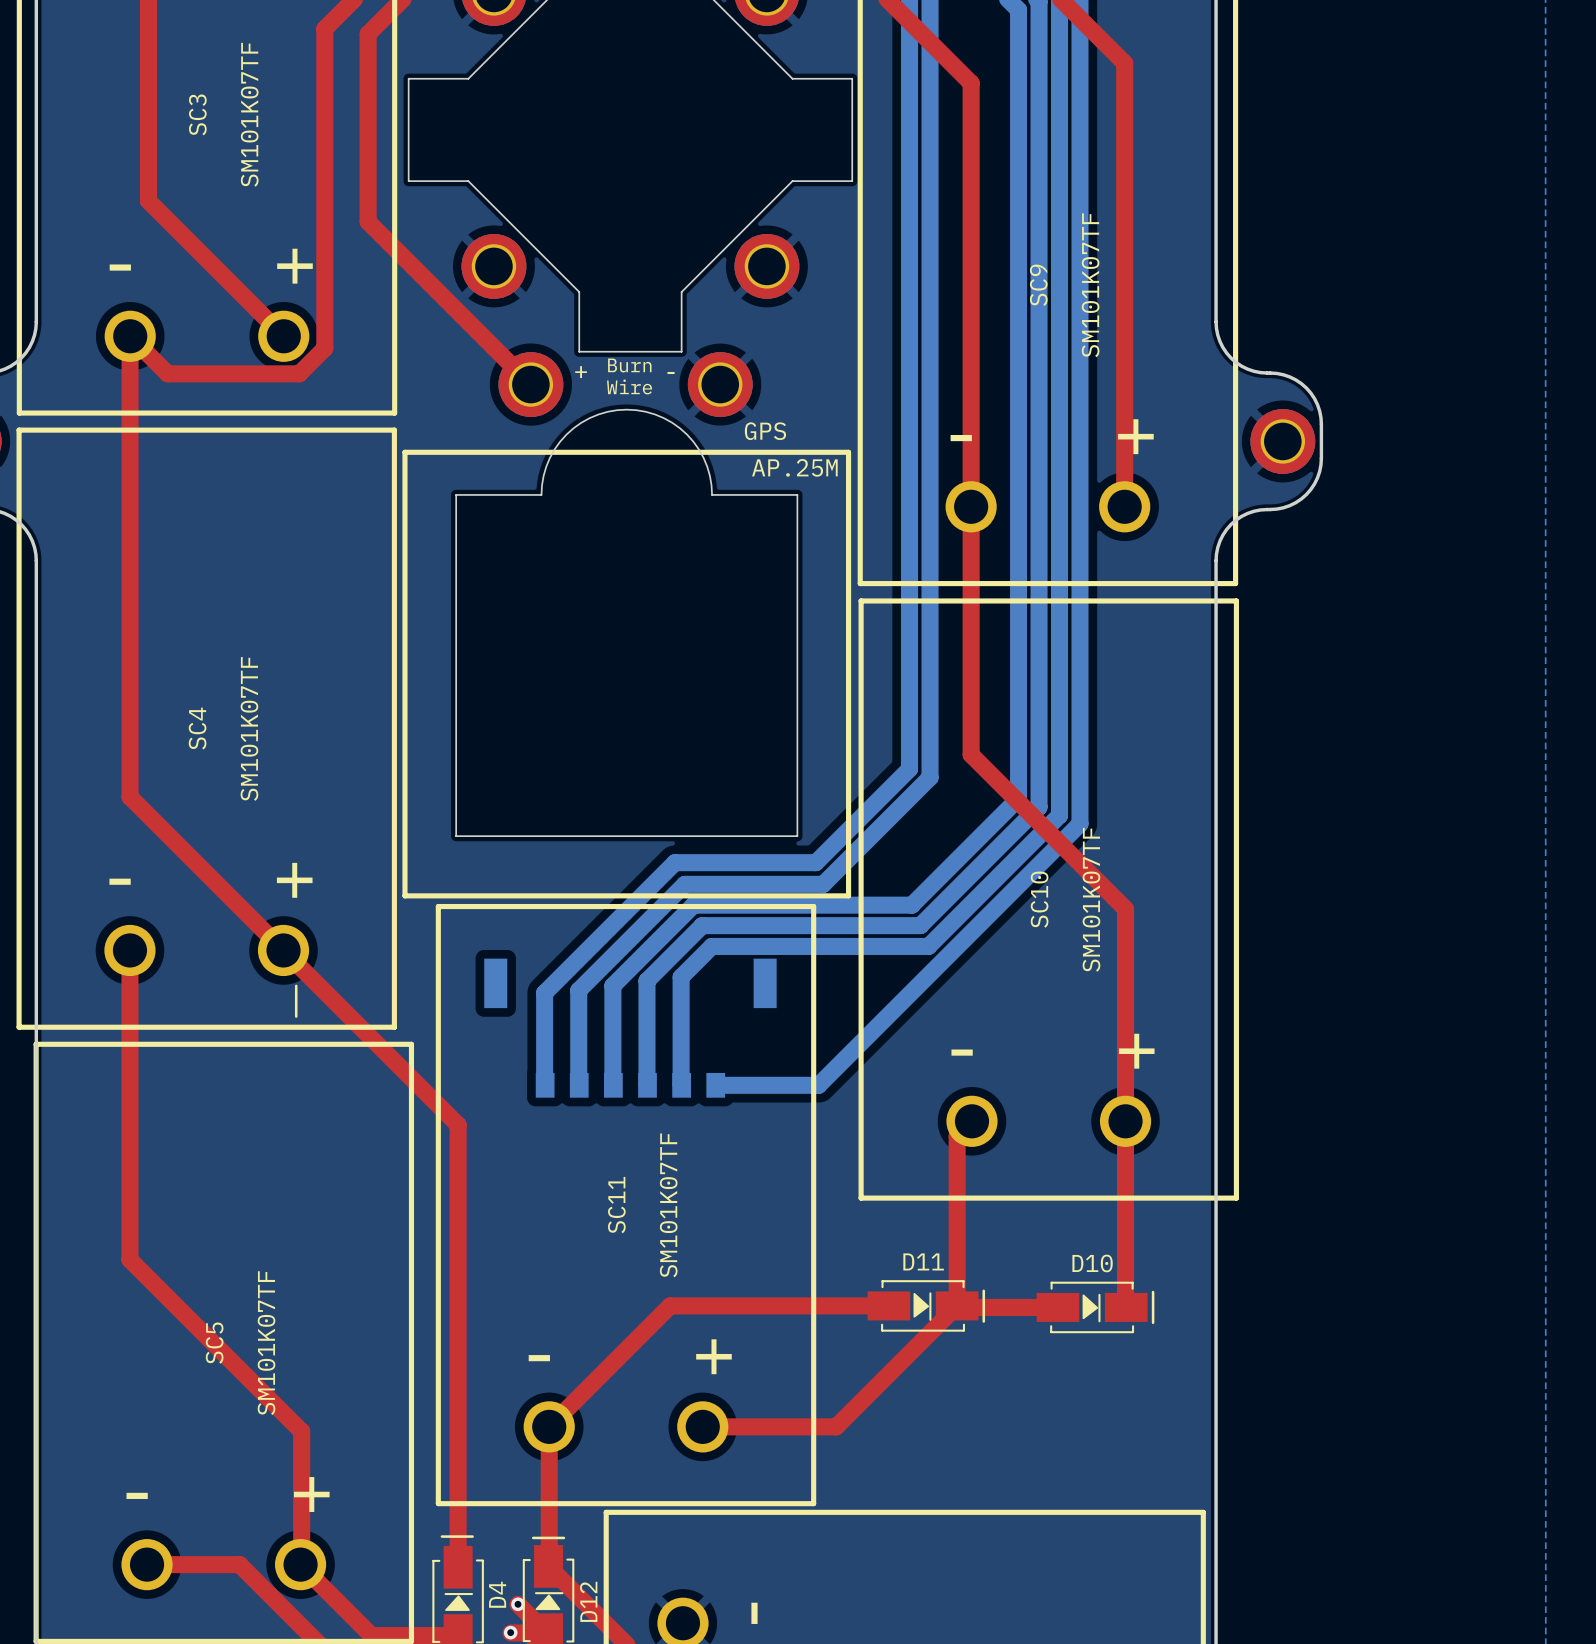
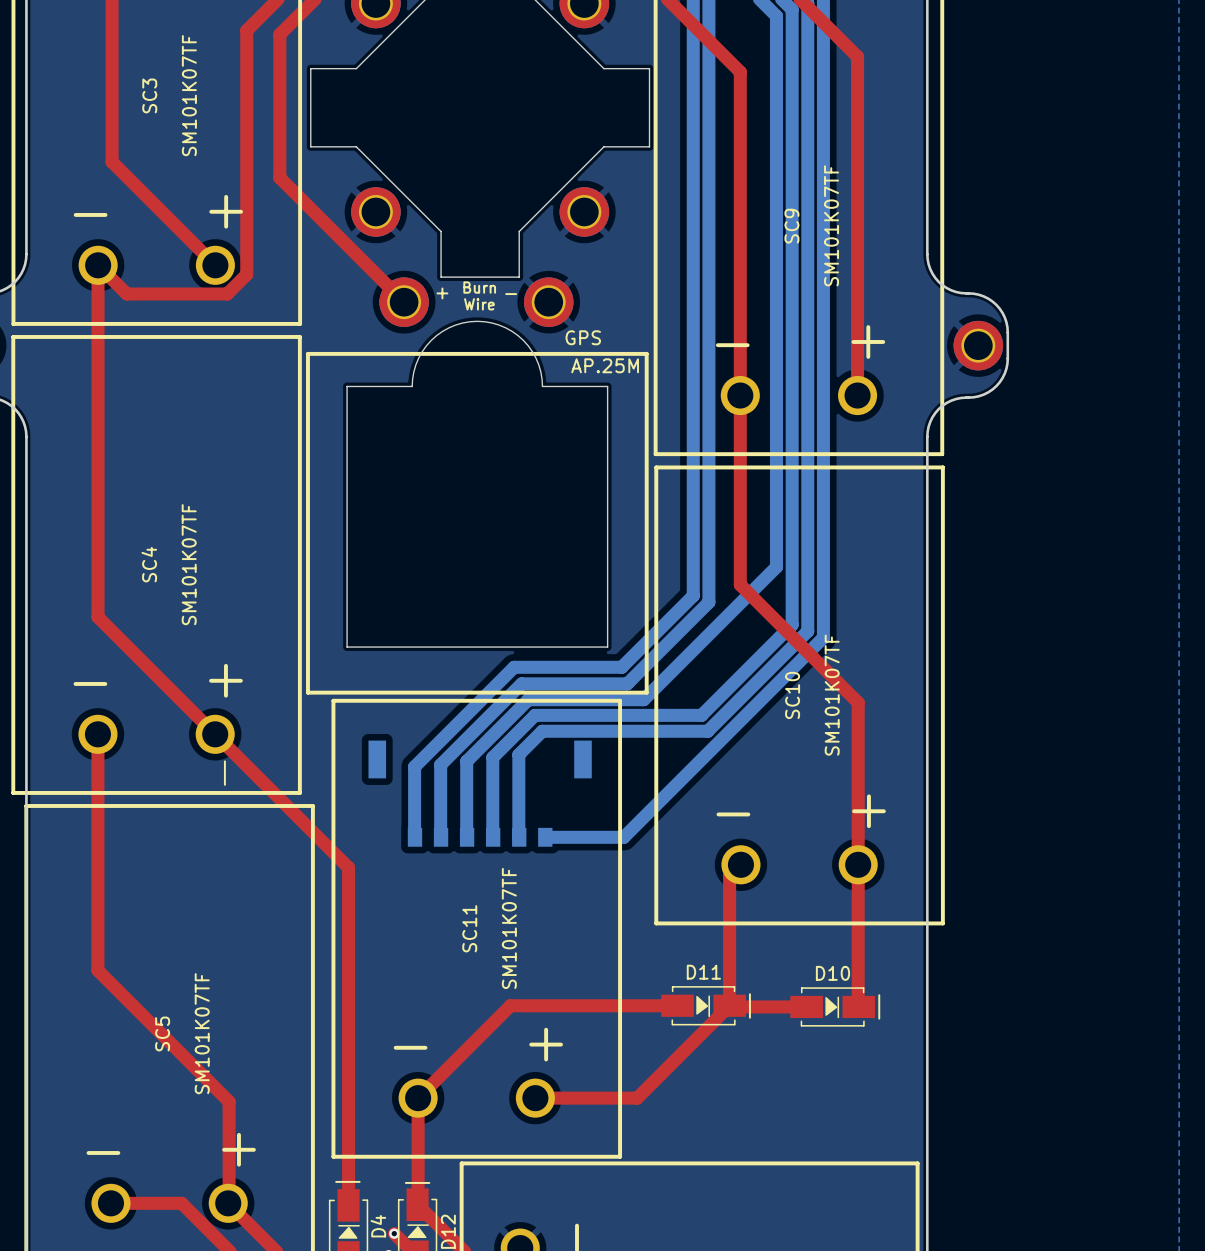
bottom track: (1018, 731) (1018, 798) (911, 905) (844, 905) -> (776, 566) (643, 699)

